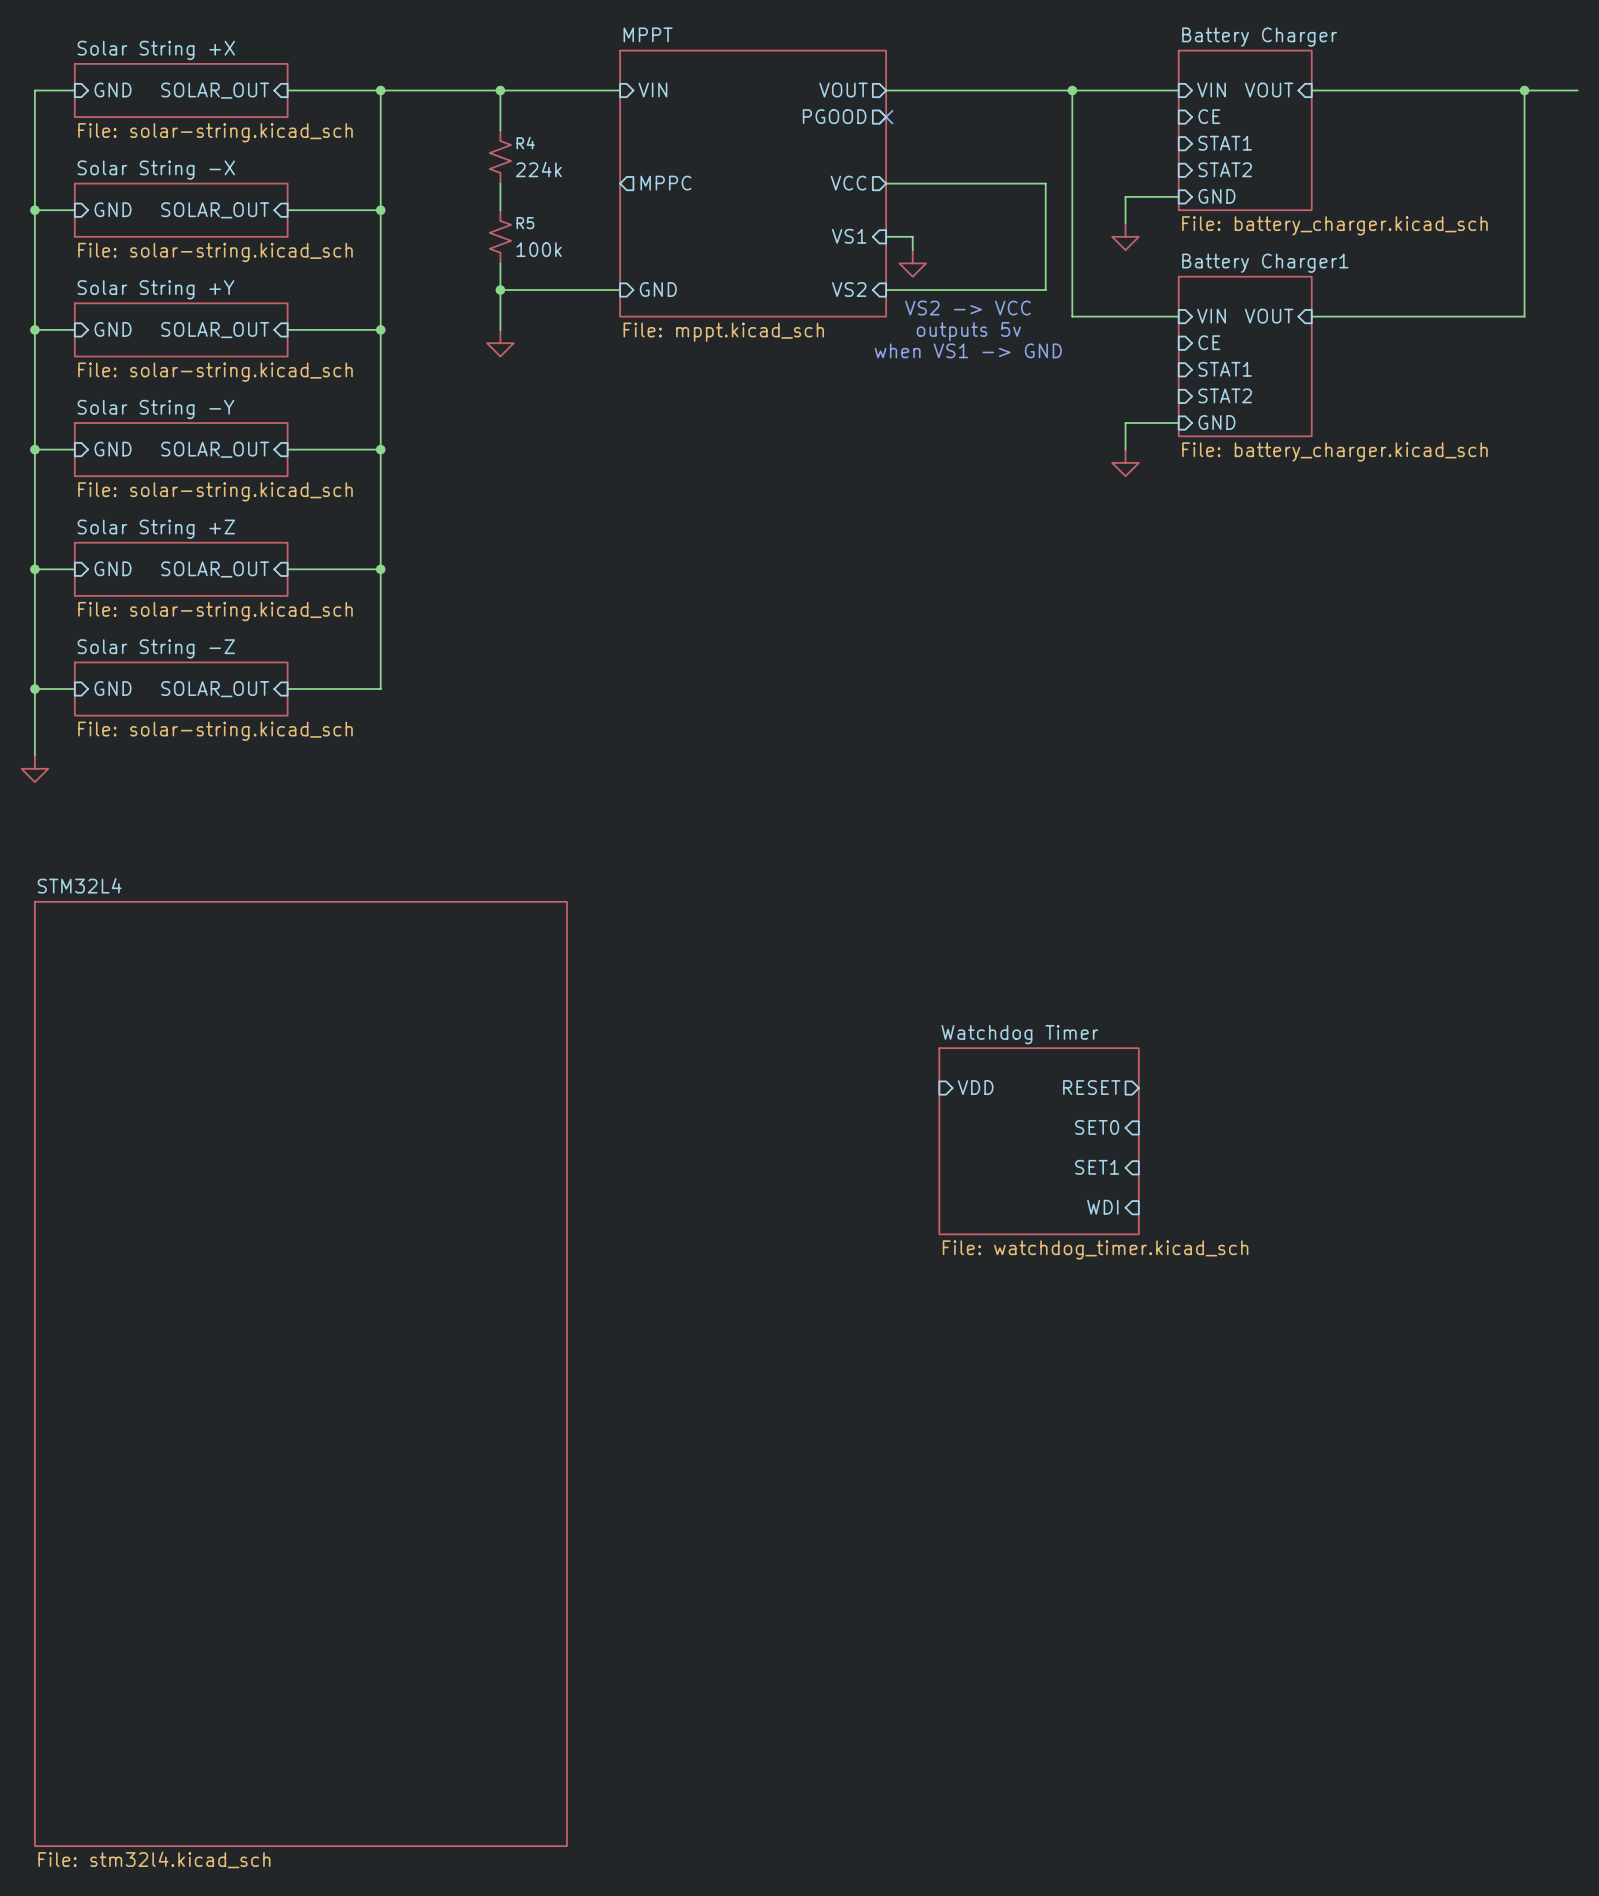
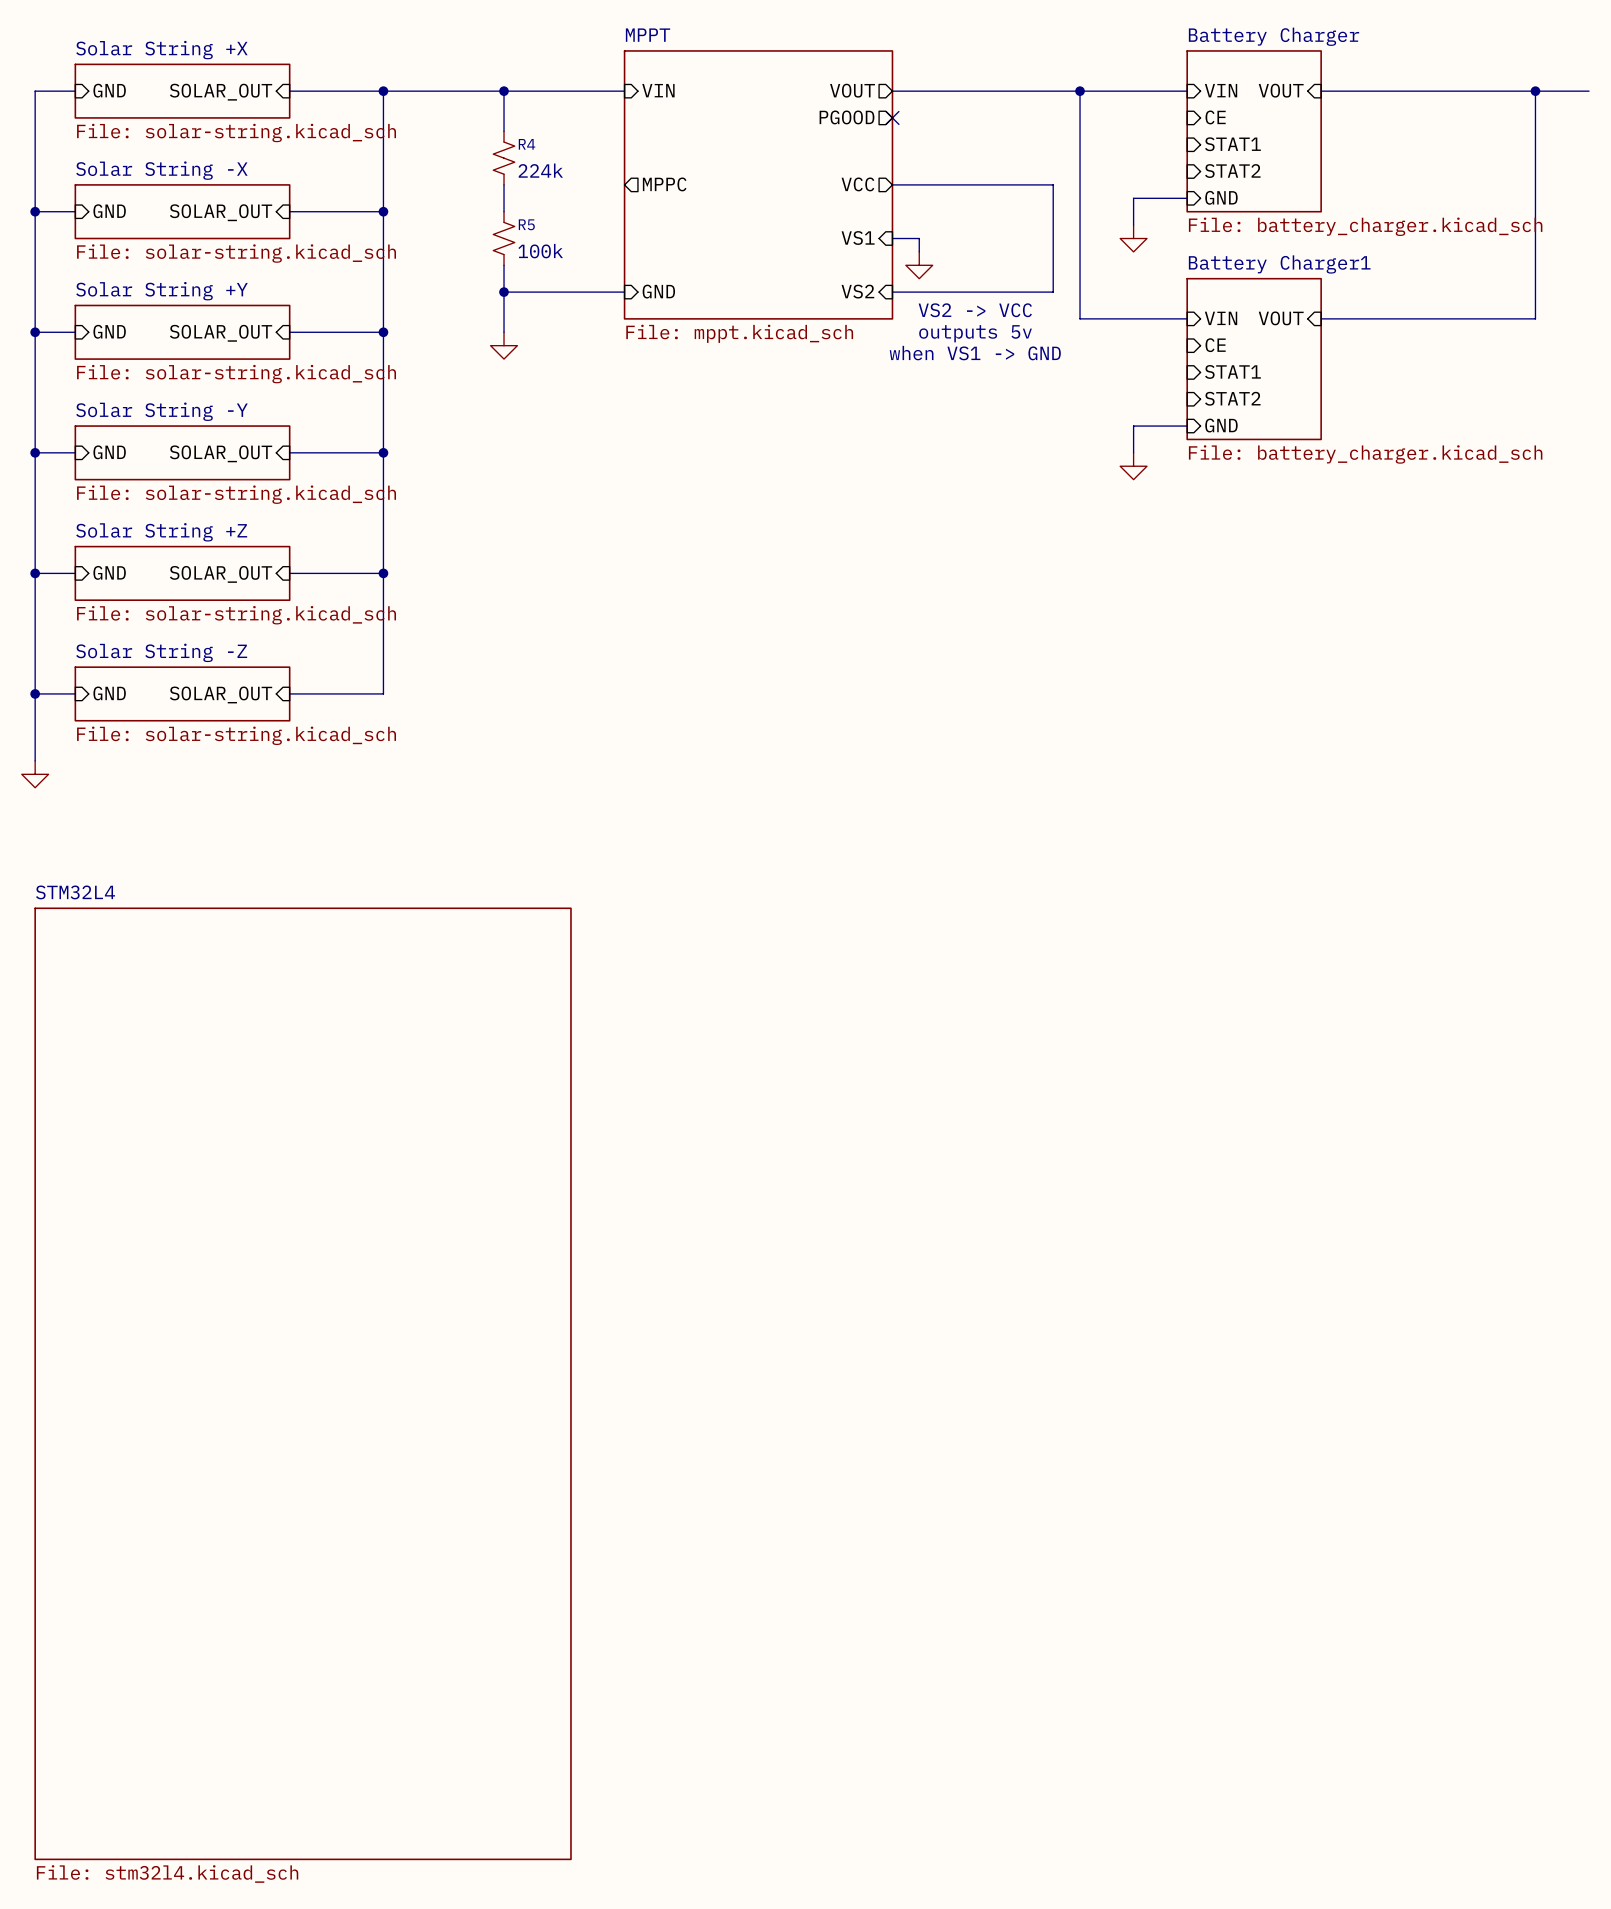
sheet pin: VDD (975, 1087) -> none
sheet pin: RESET (1091, 1087) -> none
sheet pin: SET0 (1097, 1127) -> none
sheet Watchdog Timer: File: watchdog_timer.kicad_sch (1039, 1141) -> none
sheet pin: SET1 (1097, 1167) -> none
sheet pin: WDI (1102, 1207) -> none

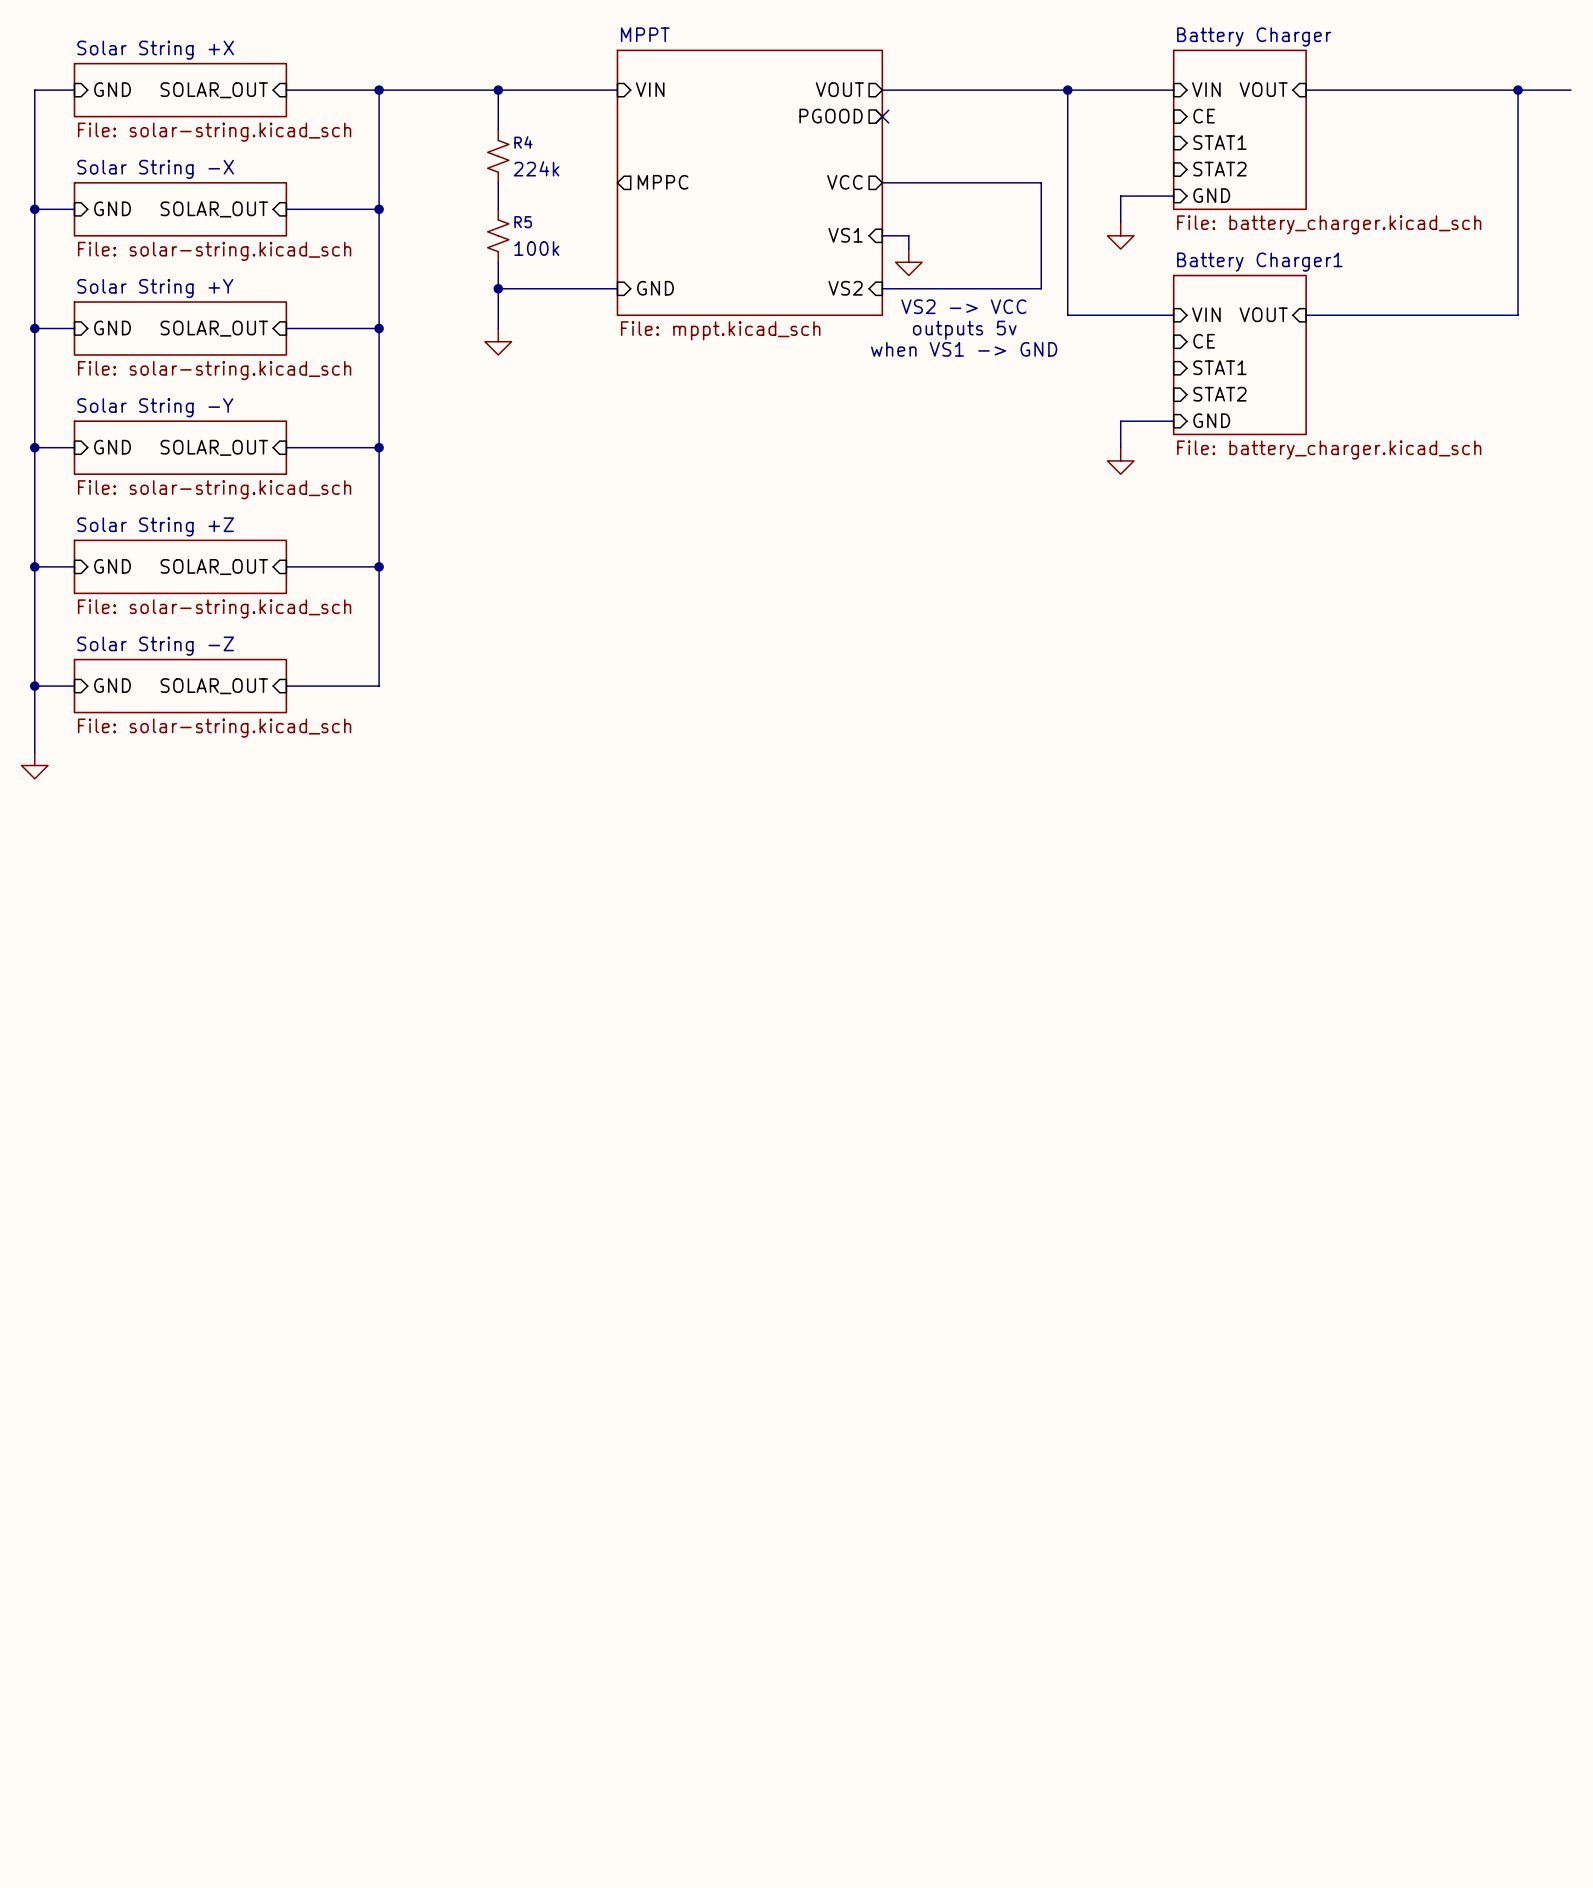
sheet STM32L4: File: stm32l4.kicad_sch (303, 1383) -> none

